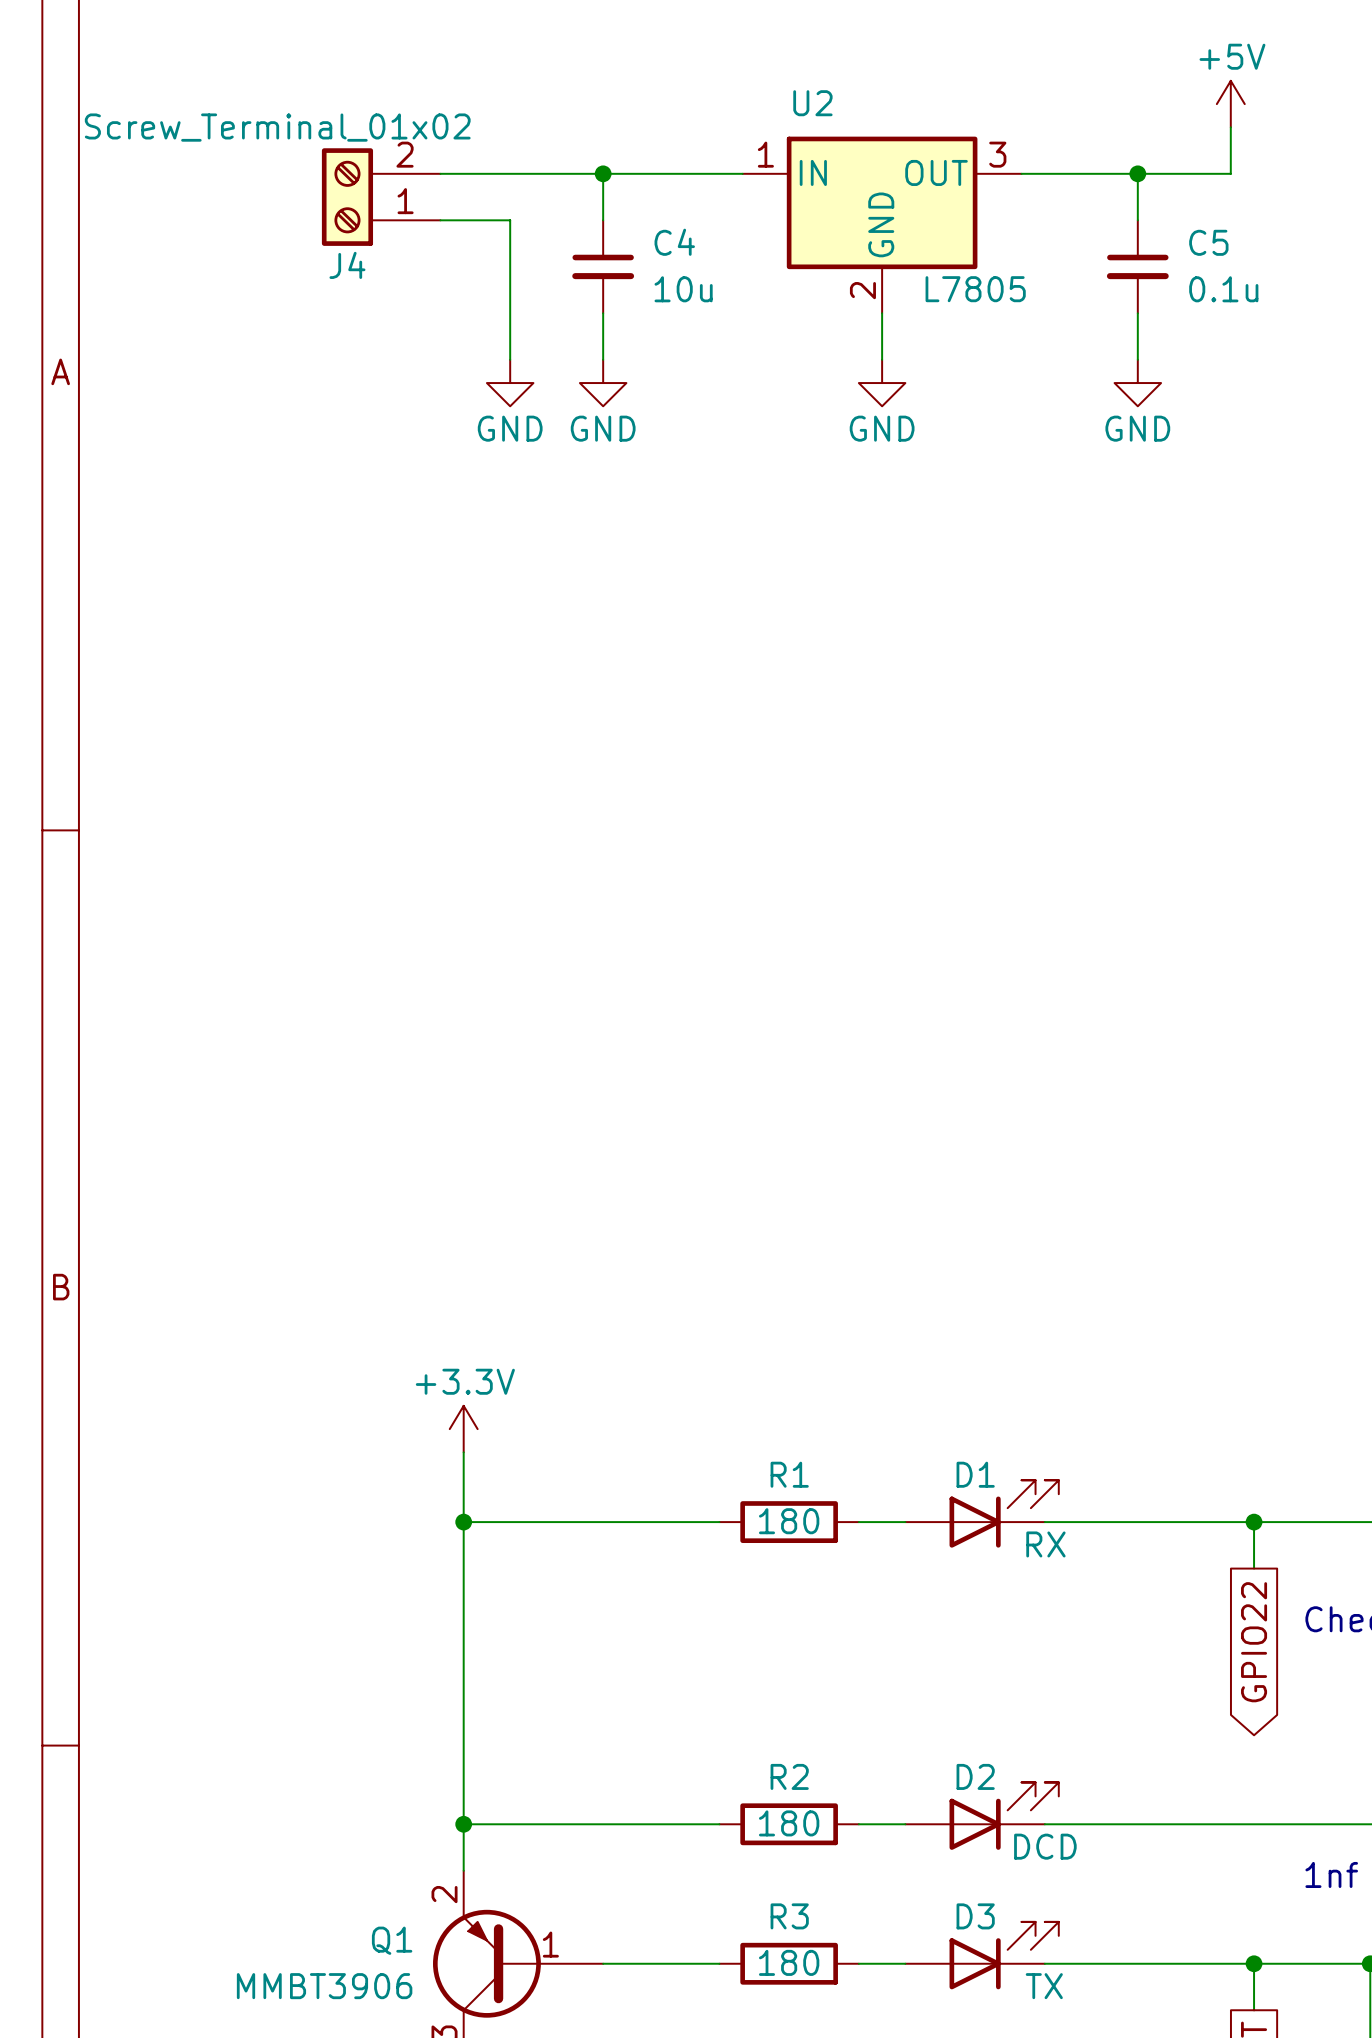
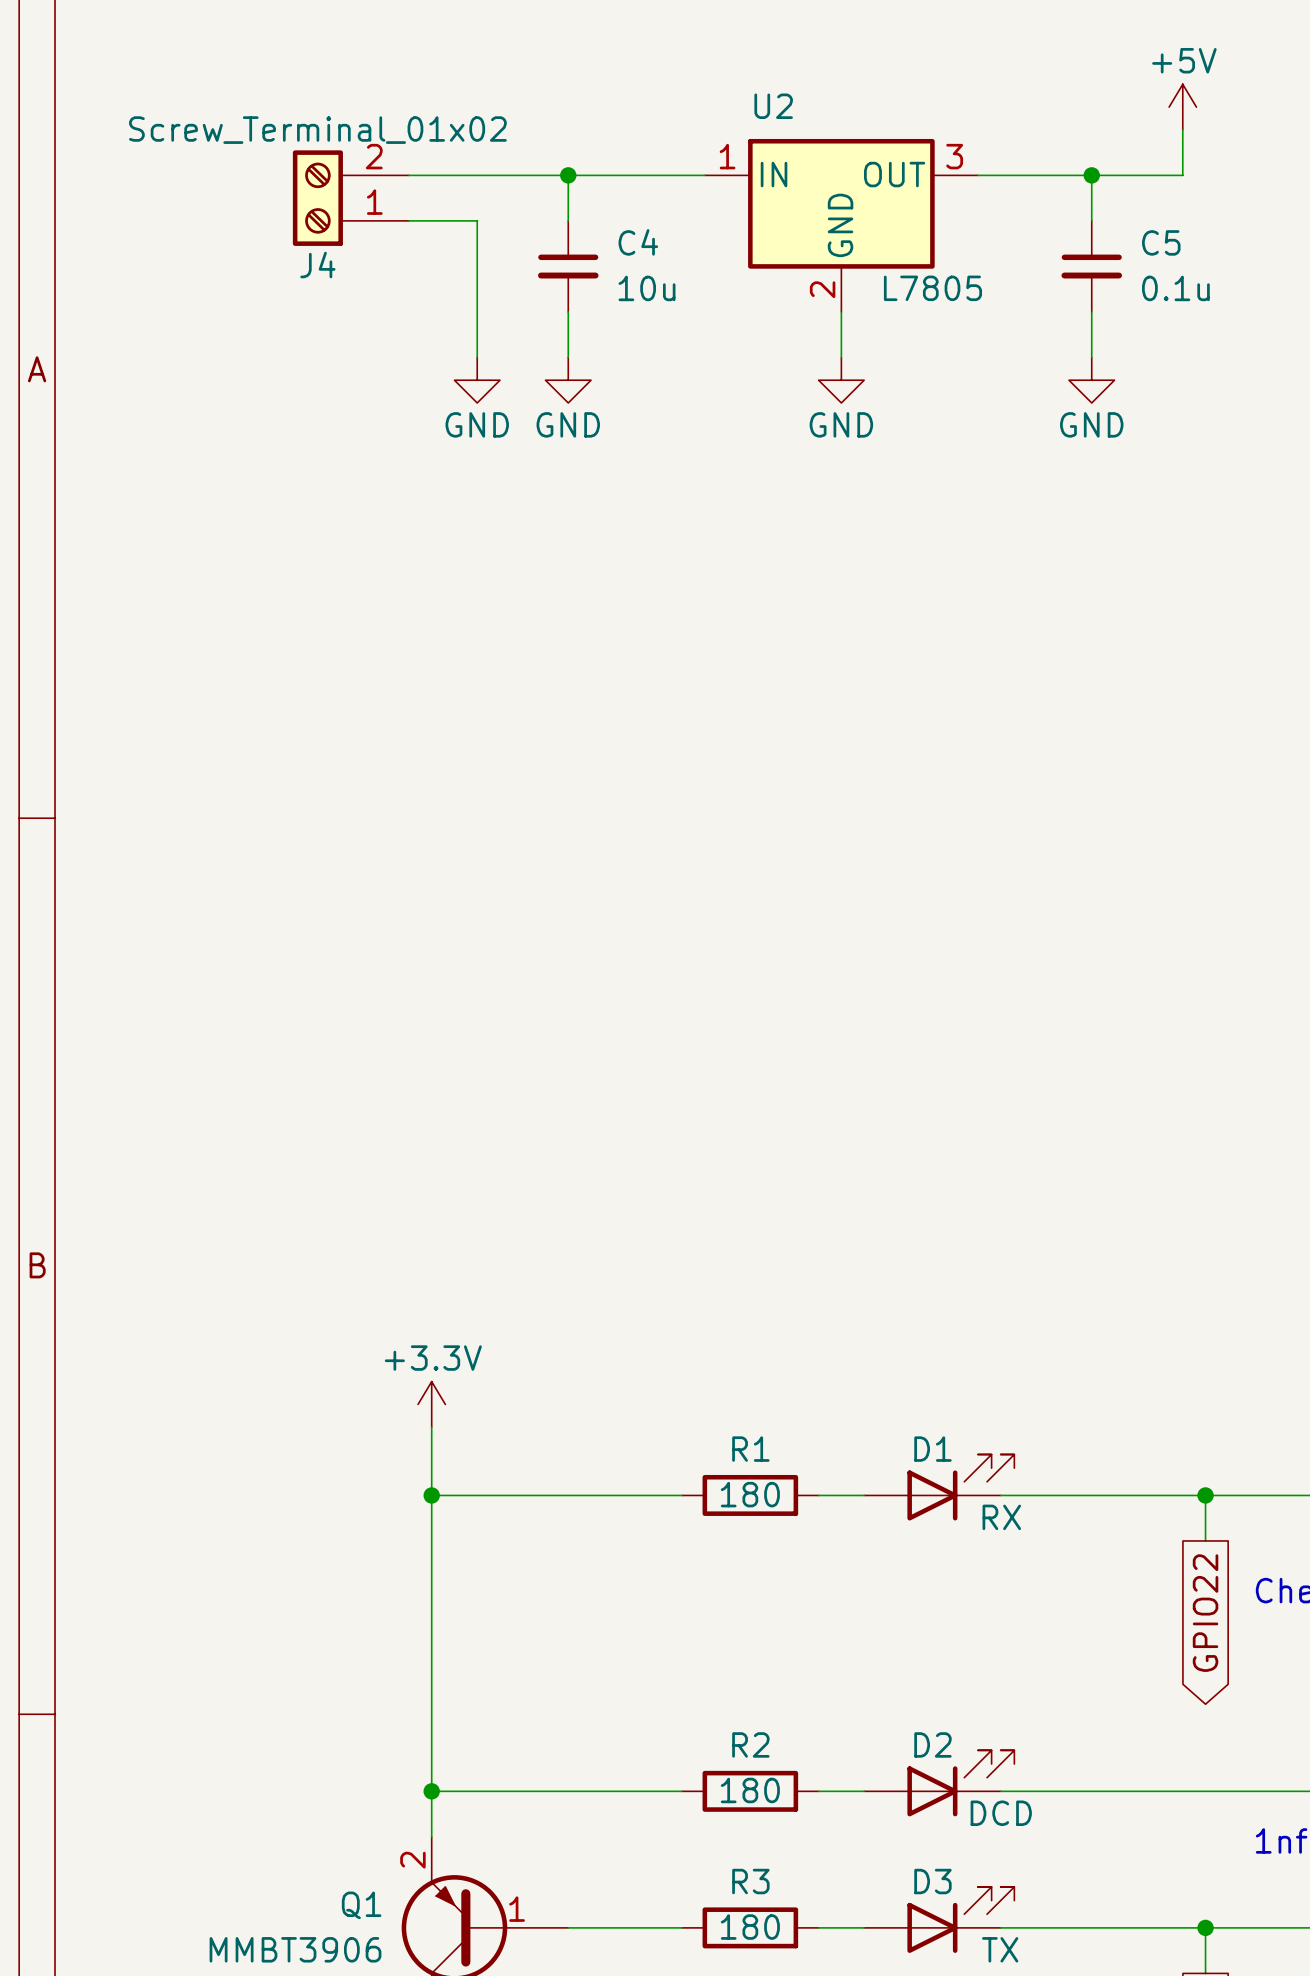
J4 value position: Screw_Terminal_01x02 (277, 127) -> Screw_Terminal_01x02 (317, 130)

